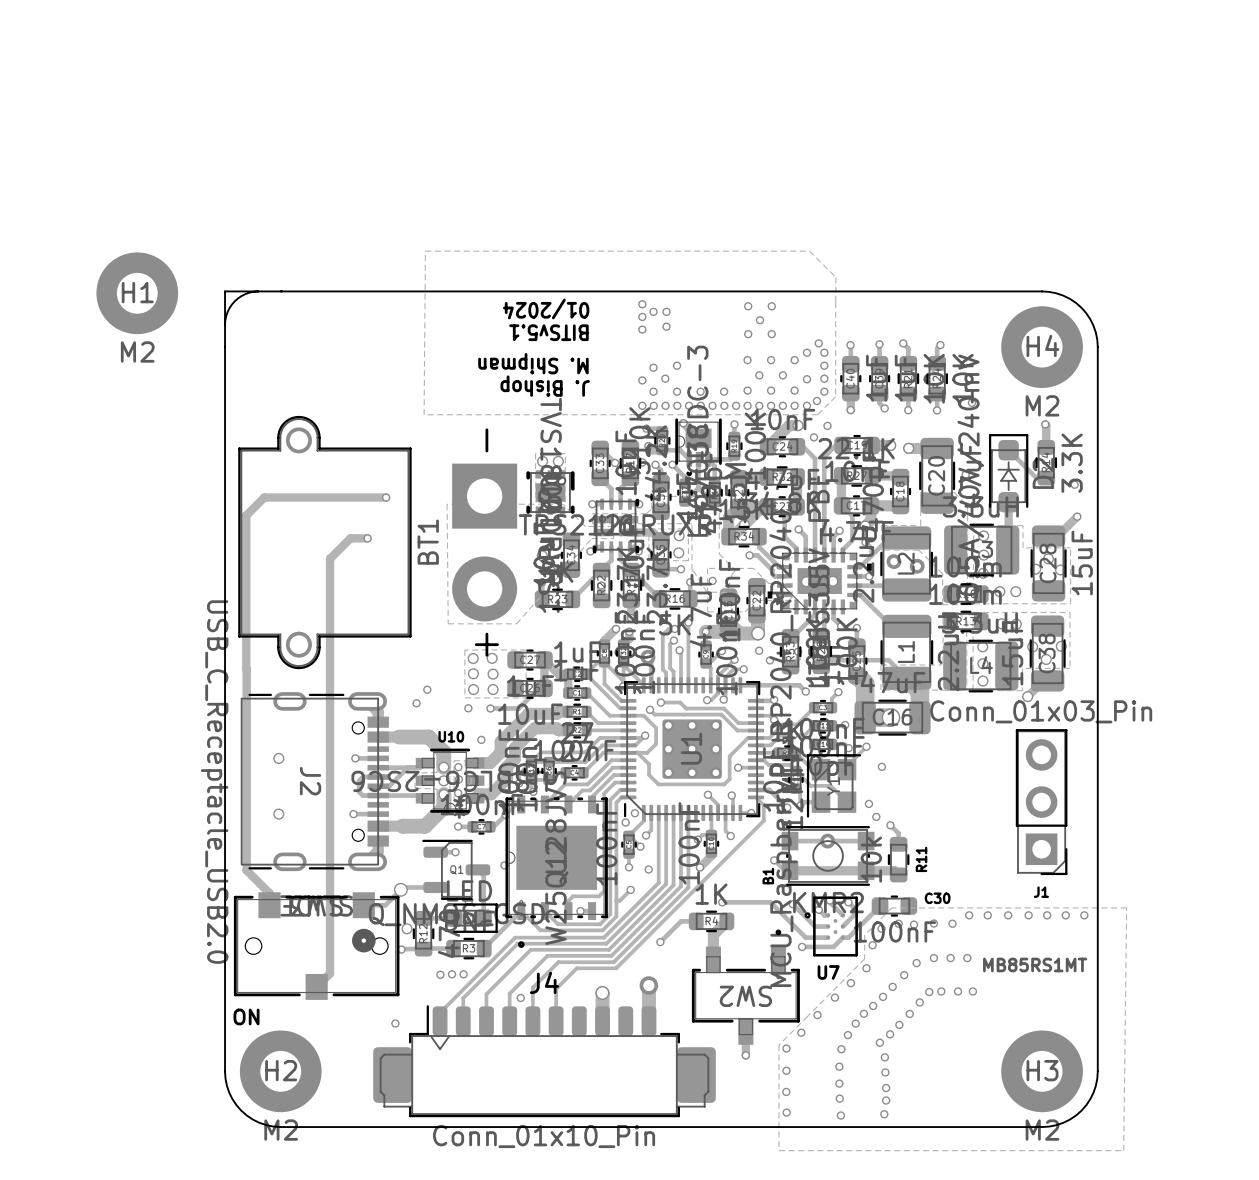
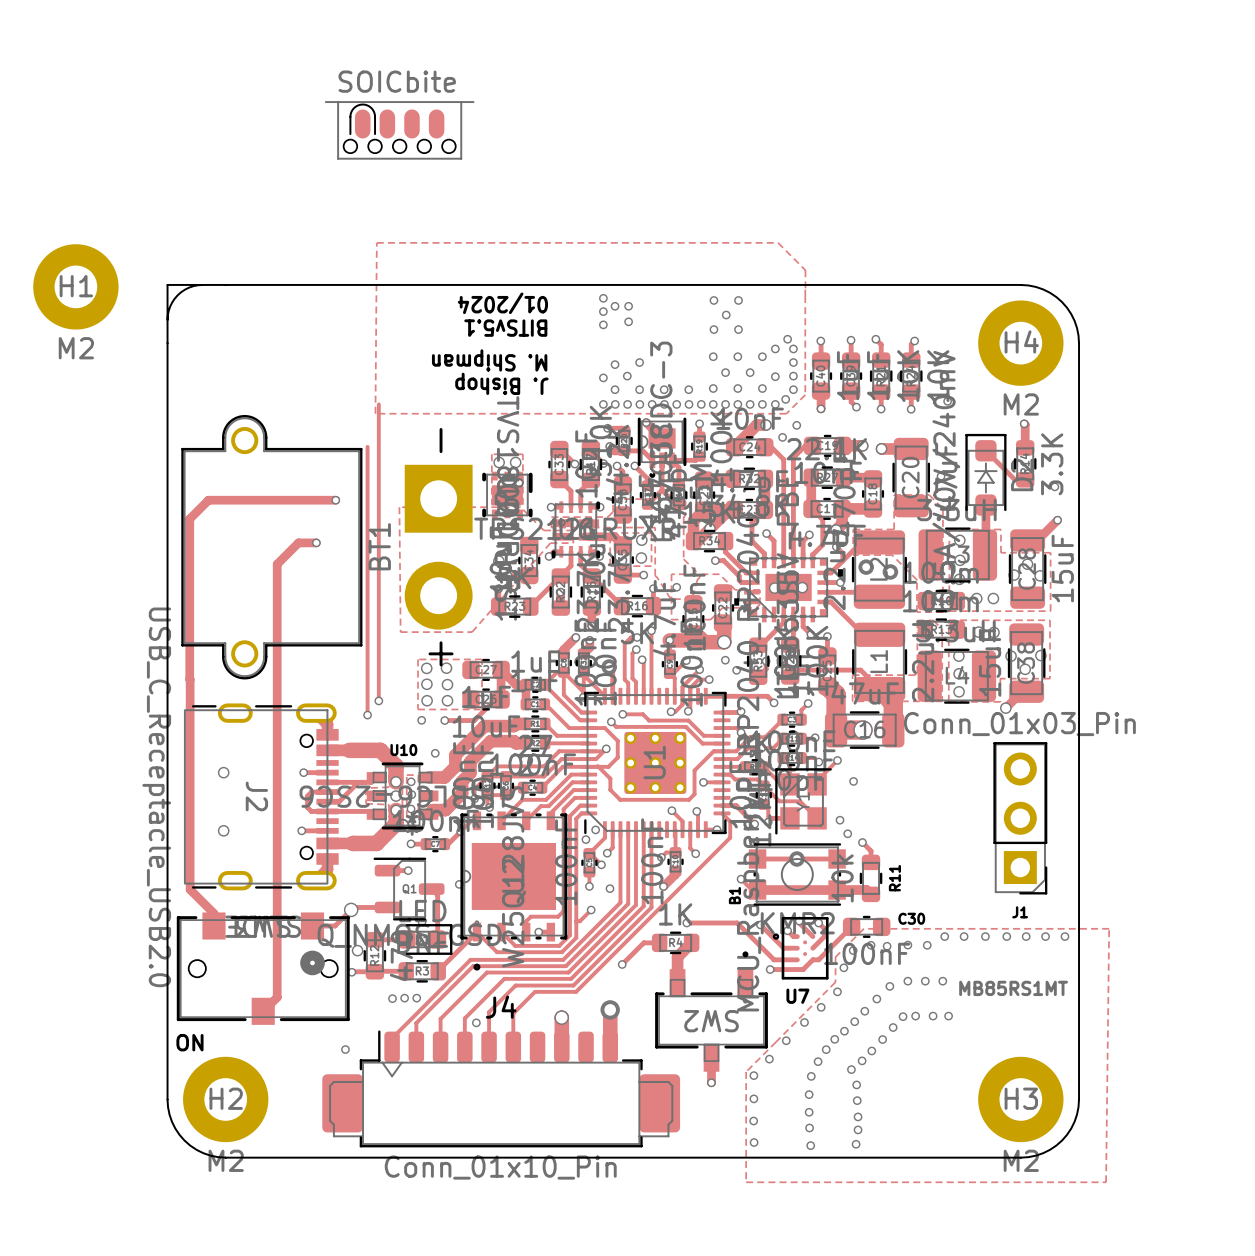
part: none -> SOICbite (399, 130)
track: none -> (378, 404) (378, 700)
track: none -> (367, 446) (367, 715)

